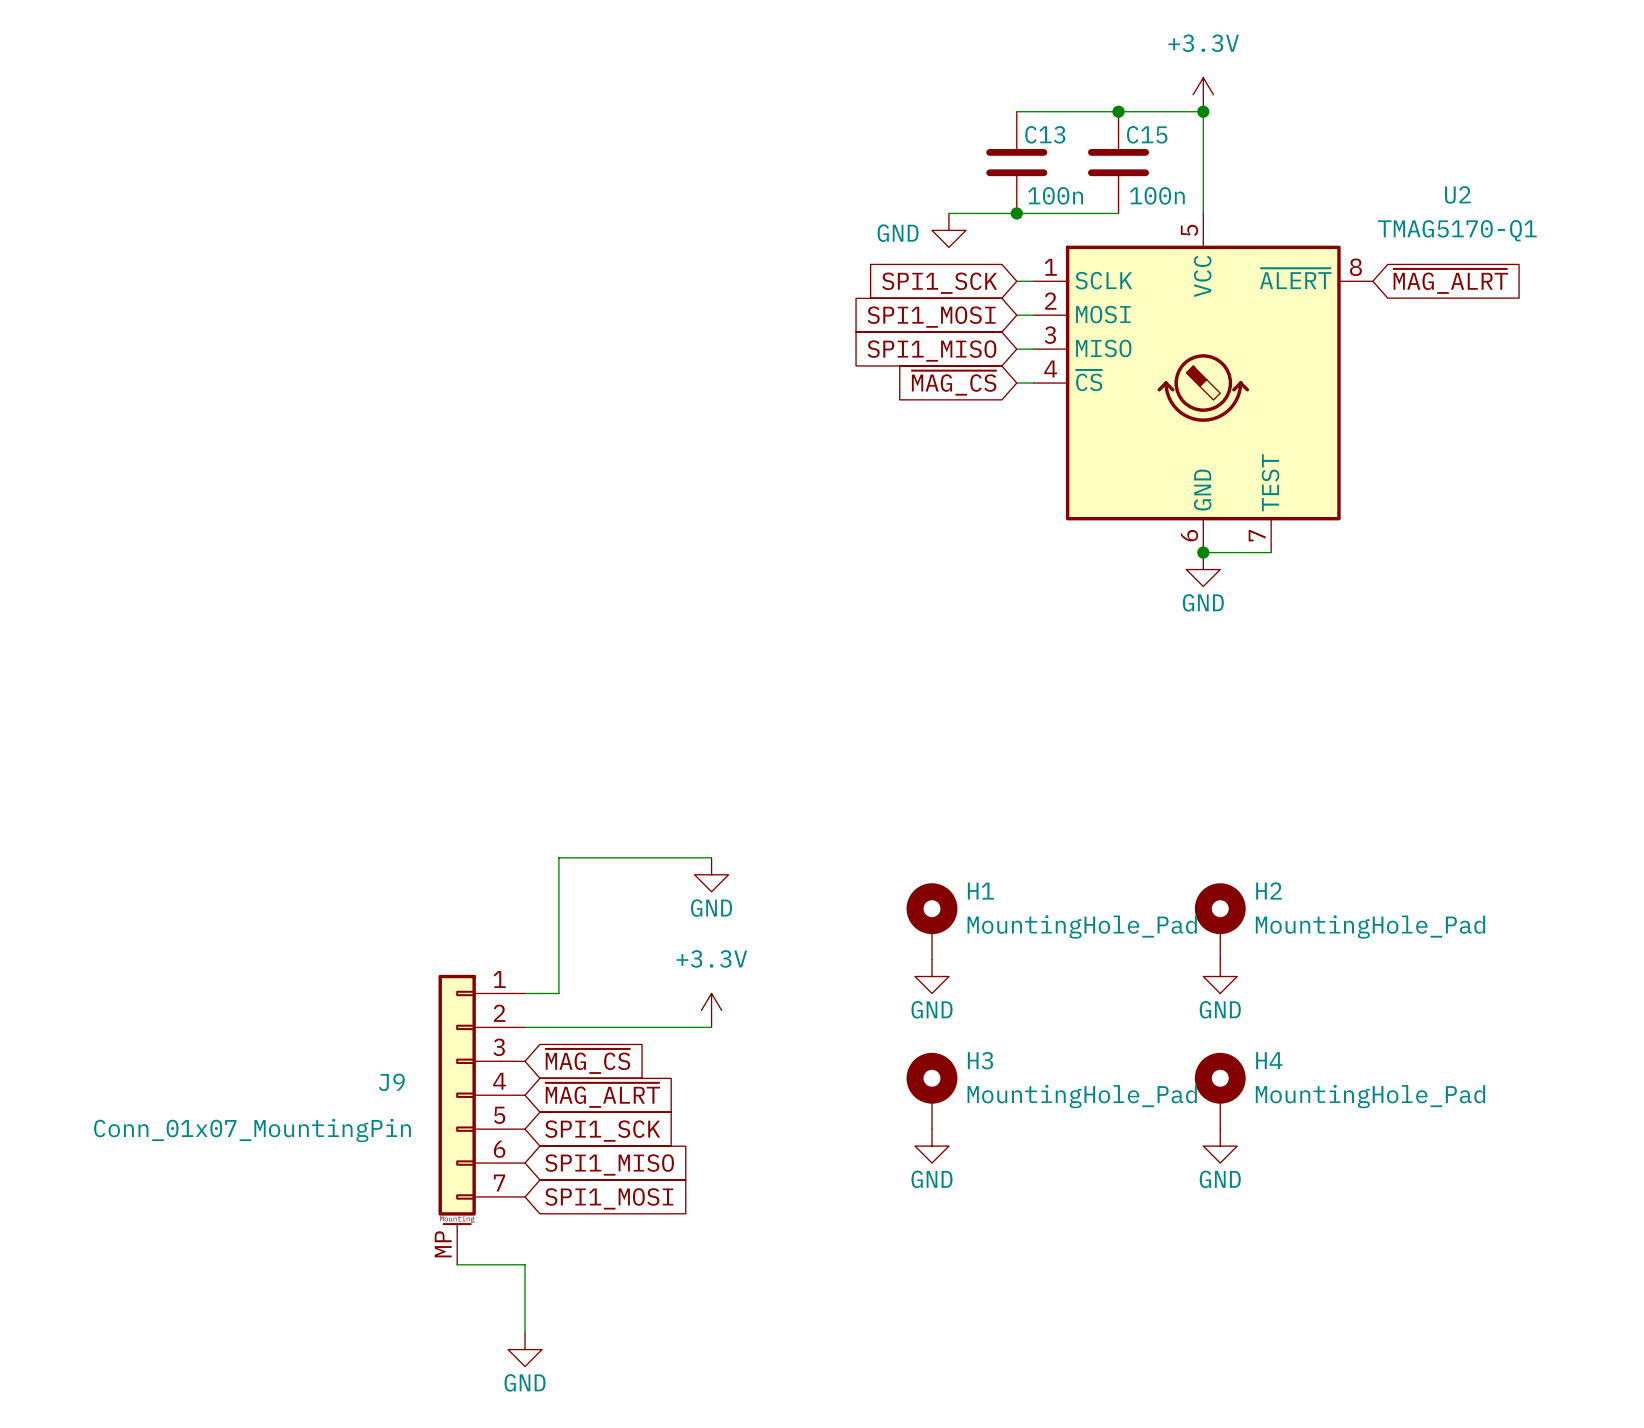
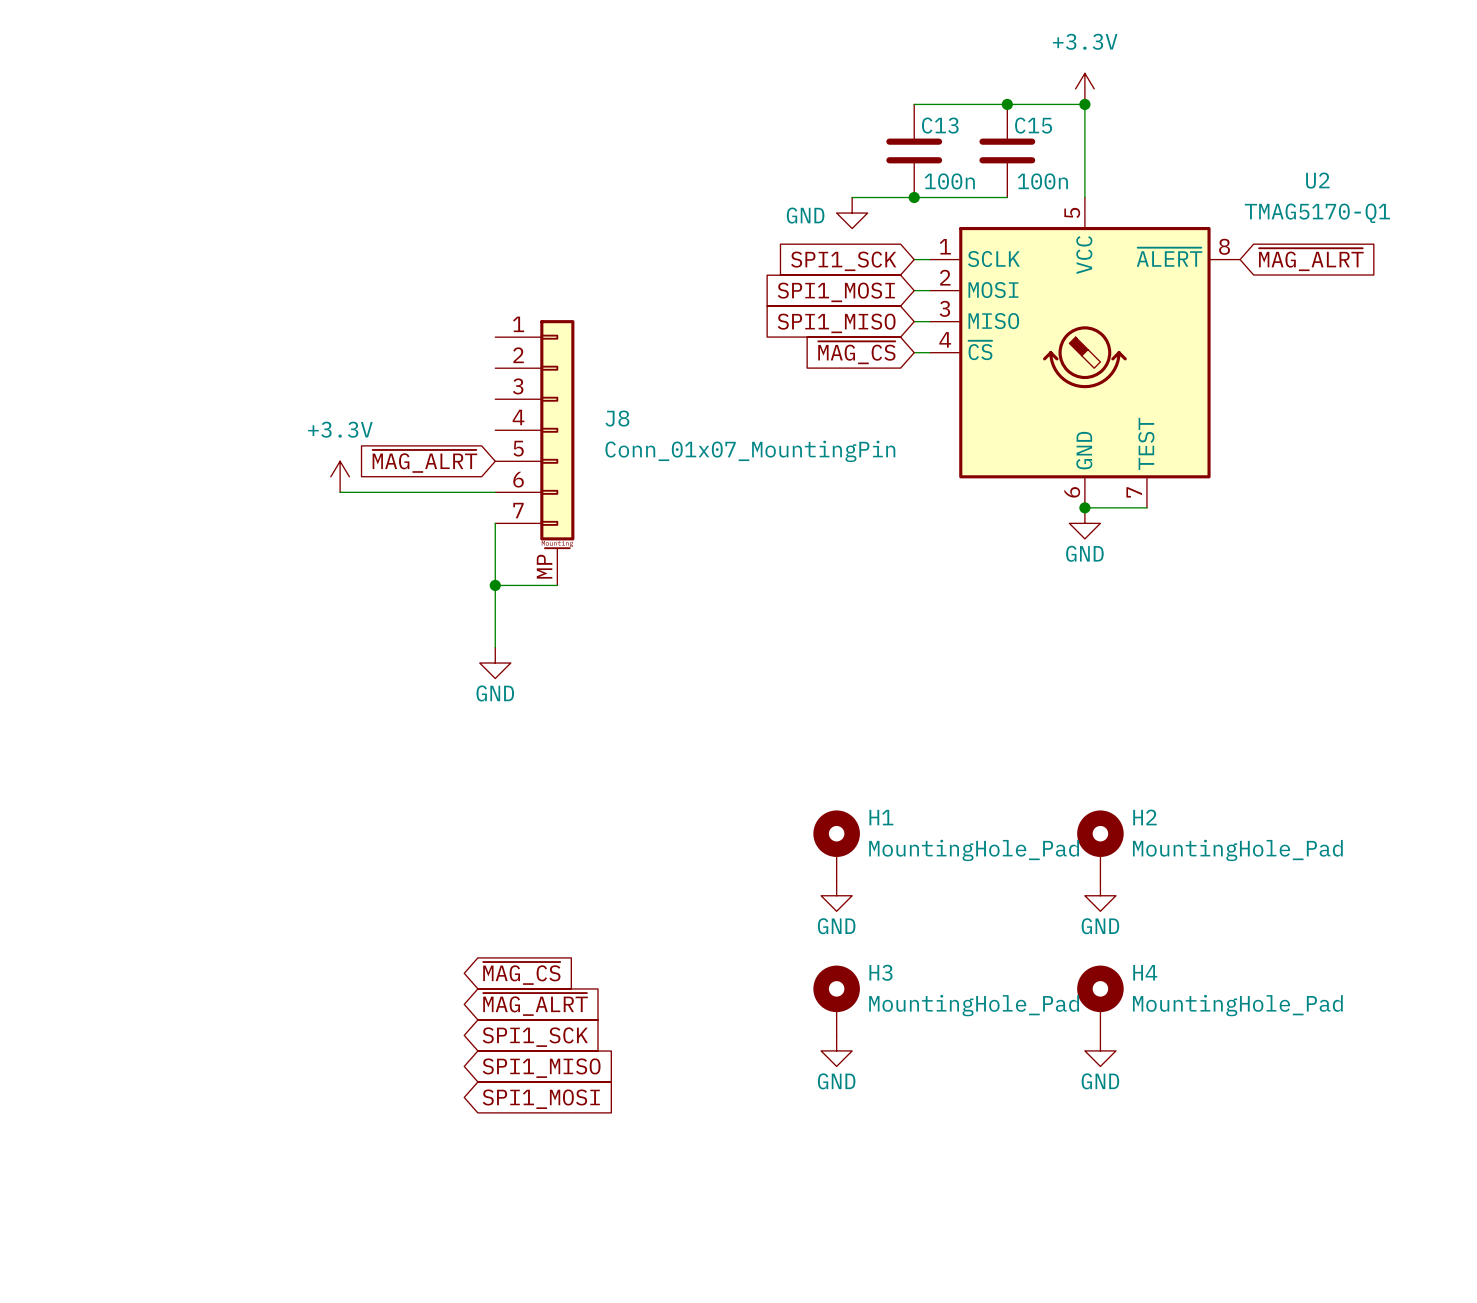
J8: none -> Conn_01x07_MountingPin (534, 452)
global label: none -> ~{MAG_ALRT} (424, 461)
power symbol: none -> +3.3V (340, 476)
wire: none -> (340, 492) (495, 492)
wire: none -> (495, 523) (495, 647)
wire: none -> (495, 585) (557, 585)
junction: none -> (495, 585)
wire: (711, 857) (558, 857) (558, 993) (525, 993) -> none
power symbol position: GND (711, 874) -> GND (495, 663)
power symbol: +3.3V (711, 1010) -> none
wire: (525, 1027) (711, 1027) -> none
J9: Conn_01x07_MountingPin (481, 1119) -> none
wire: (457, 1264) (525, 1264) (525, 1332) -> none
power symbol: GND (525, 1349) -> none

